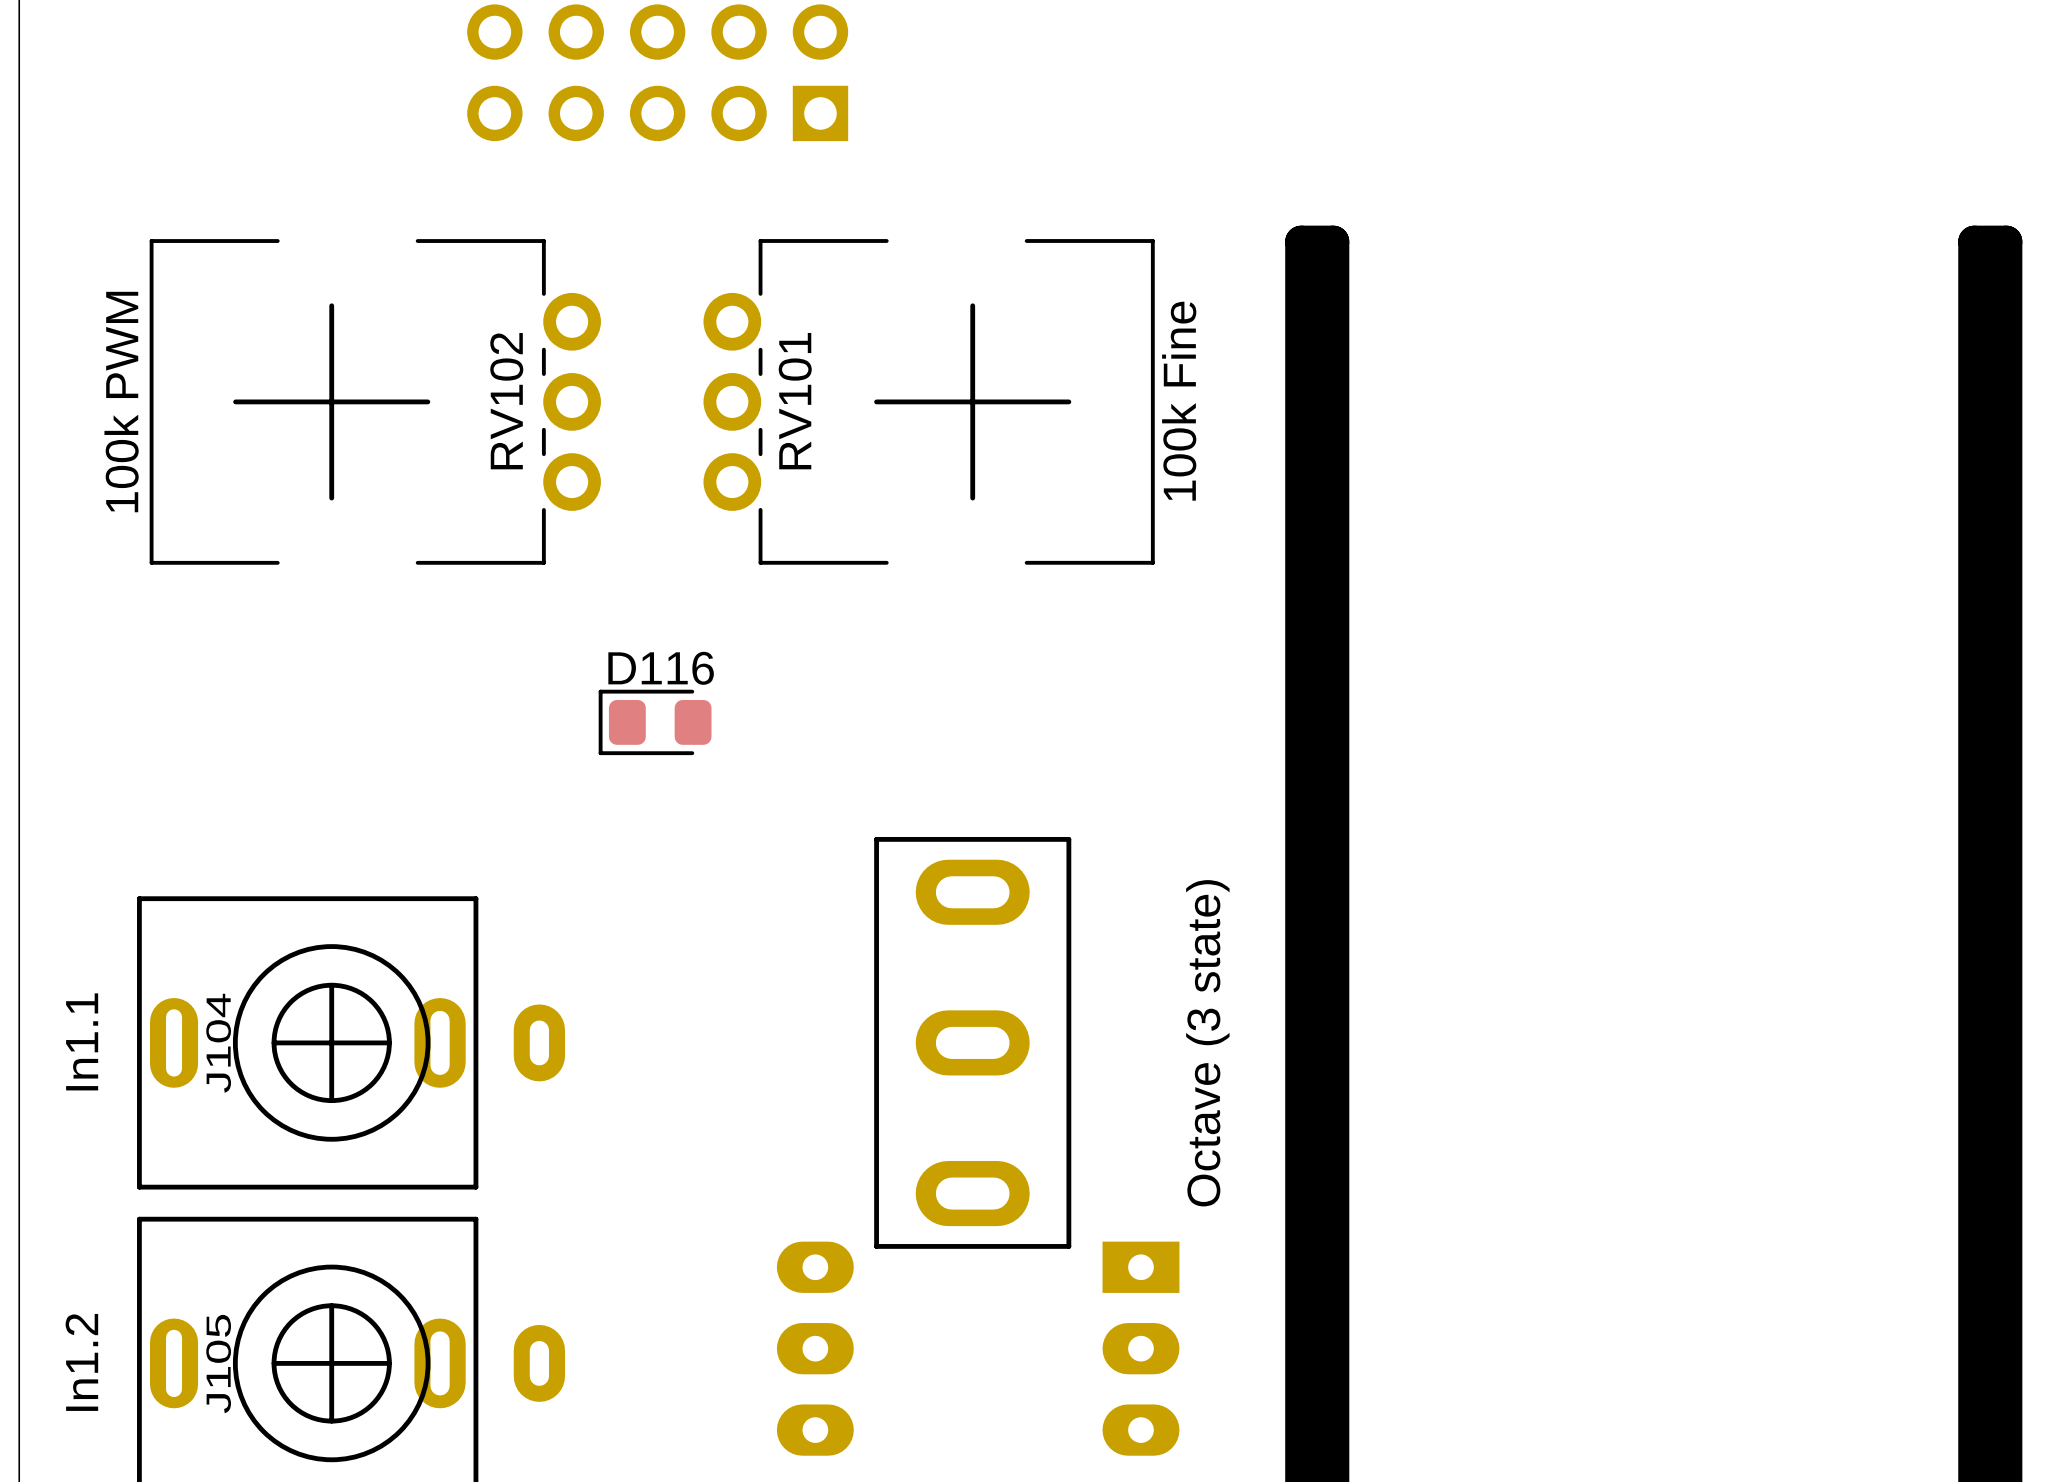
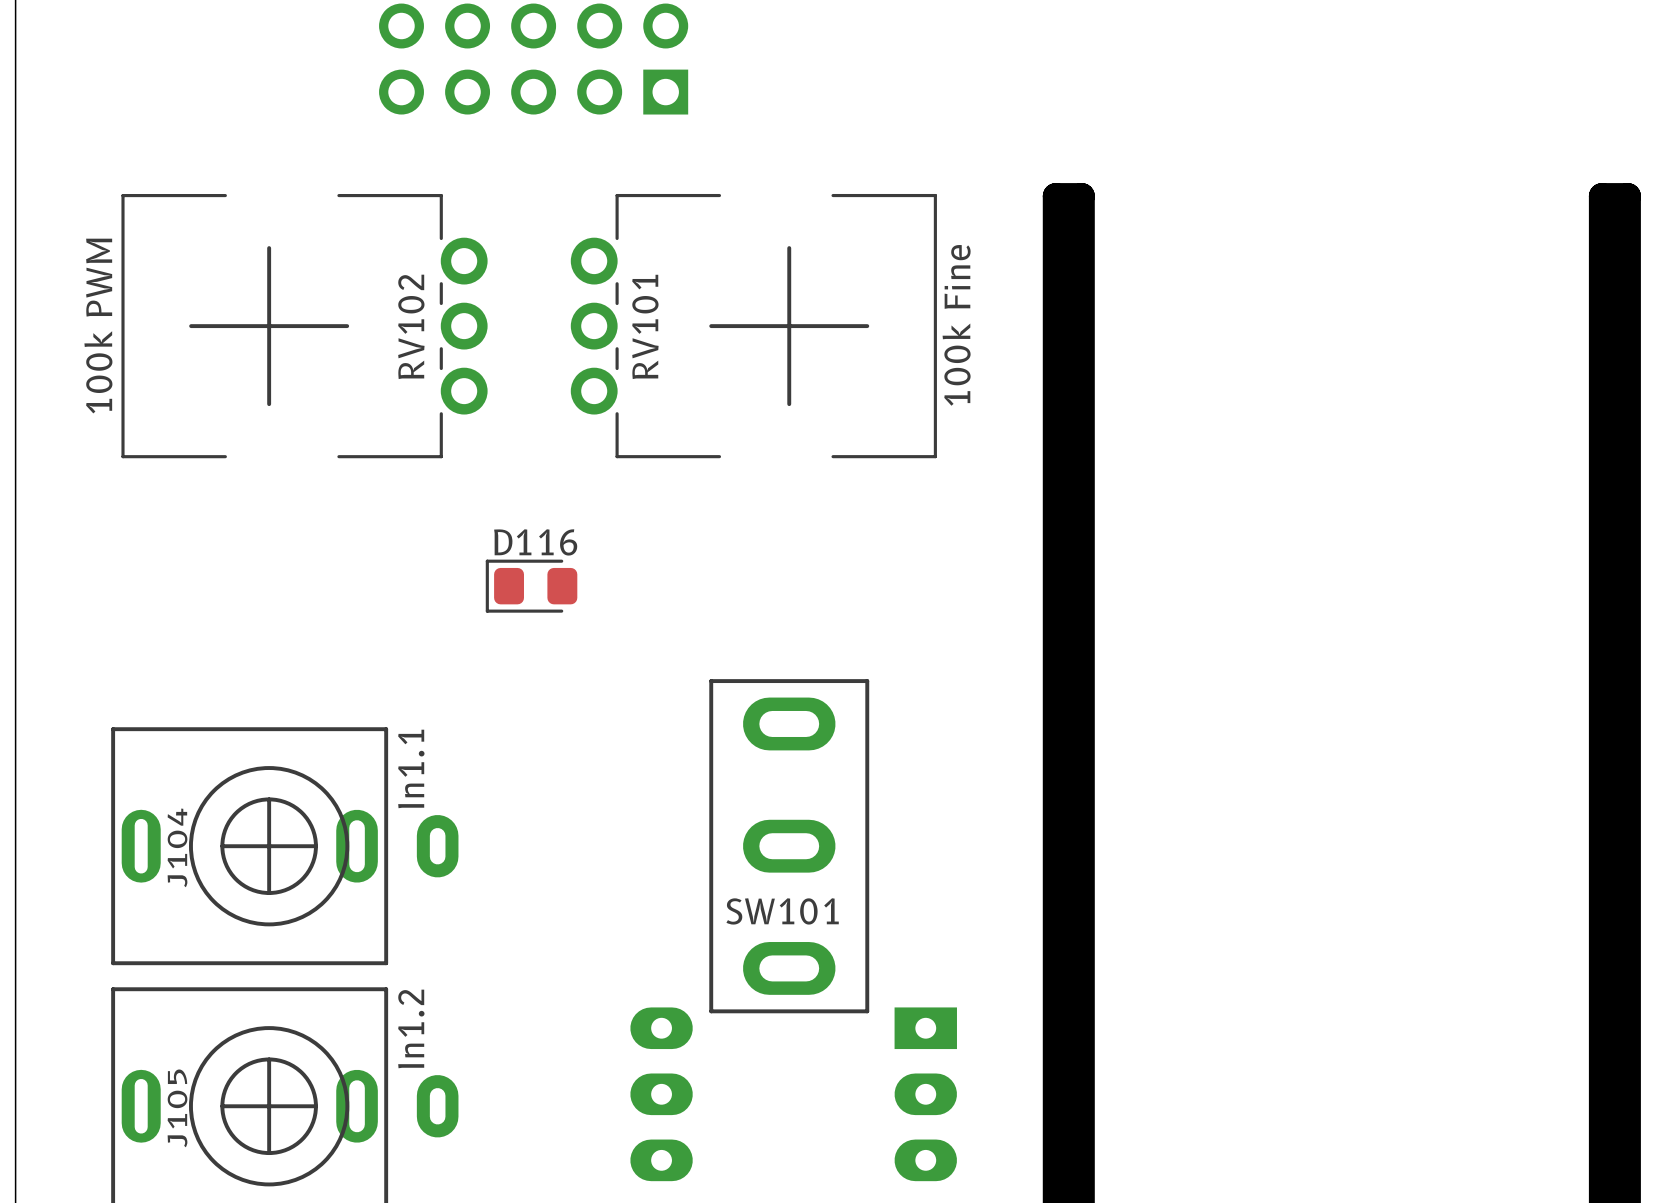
J104 value position: In1.1 (82, 1041) -> In1.1 (411, 768)
SW101 value: Octave (3 state) (1207, 1043) -> none
SW101 name: none -> SW101 (782, 911)
J105 value position: In1.2 (81, 1362) -> In1.2 (411, 1028)

